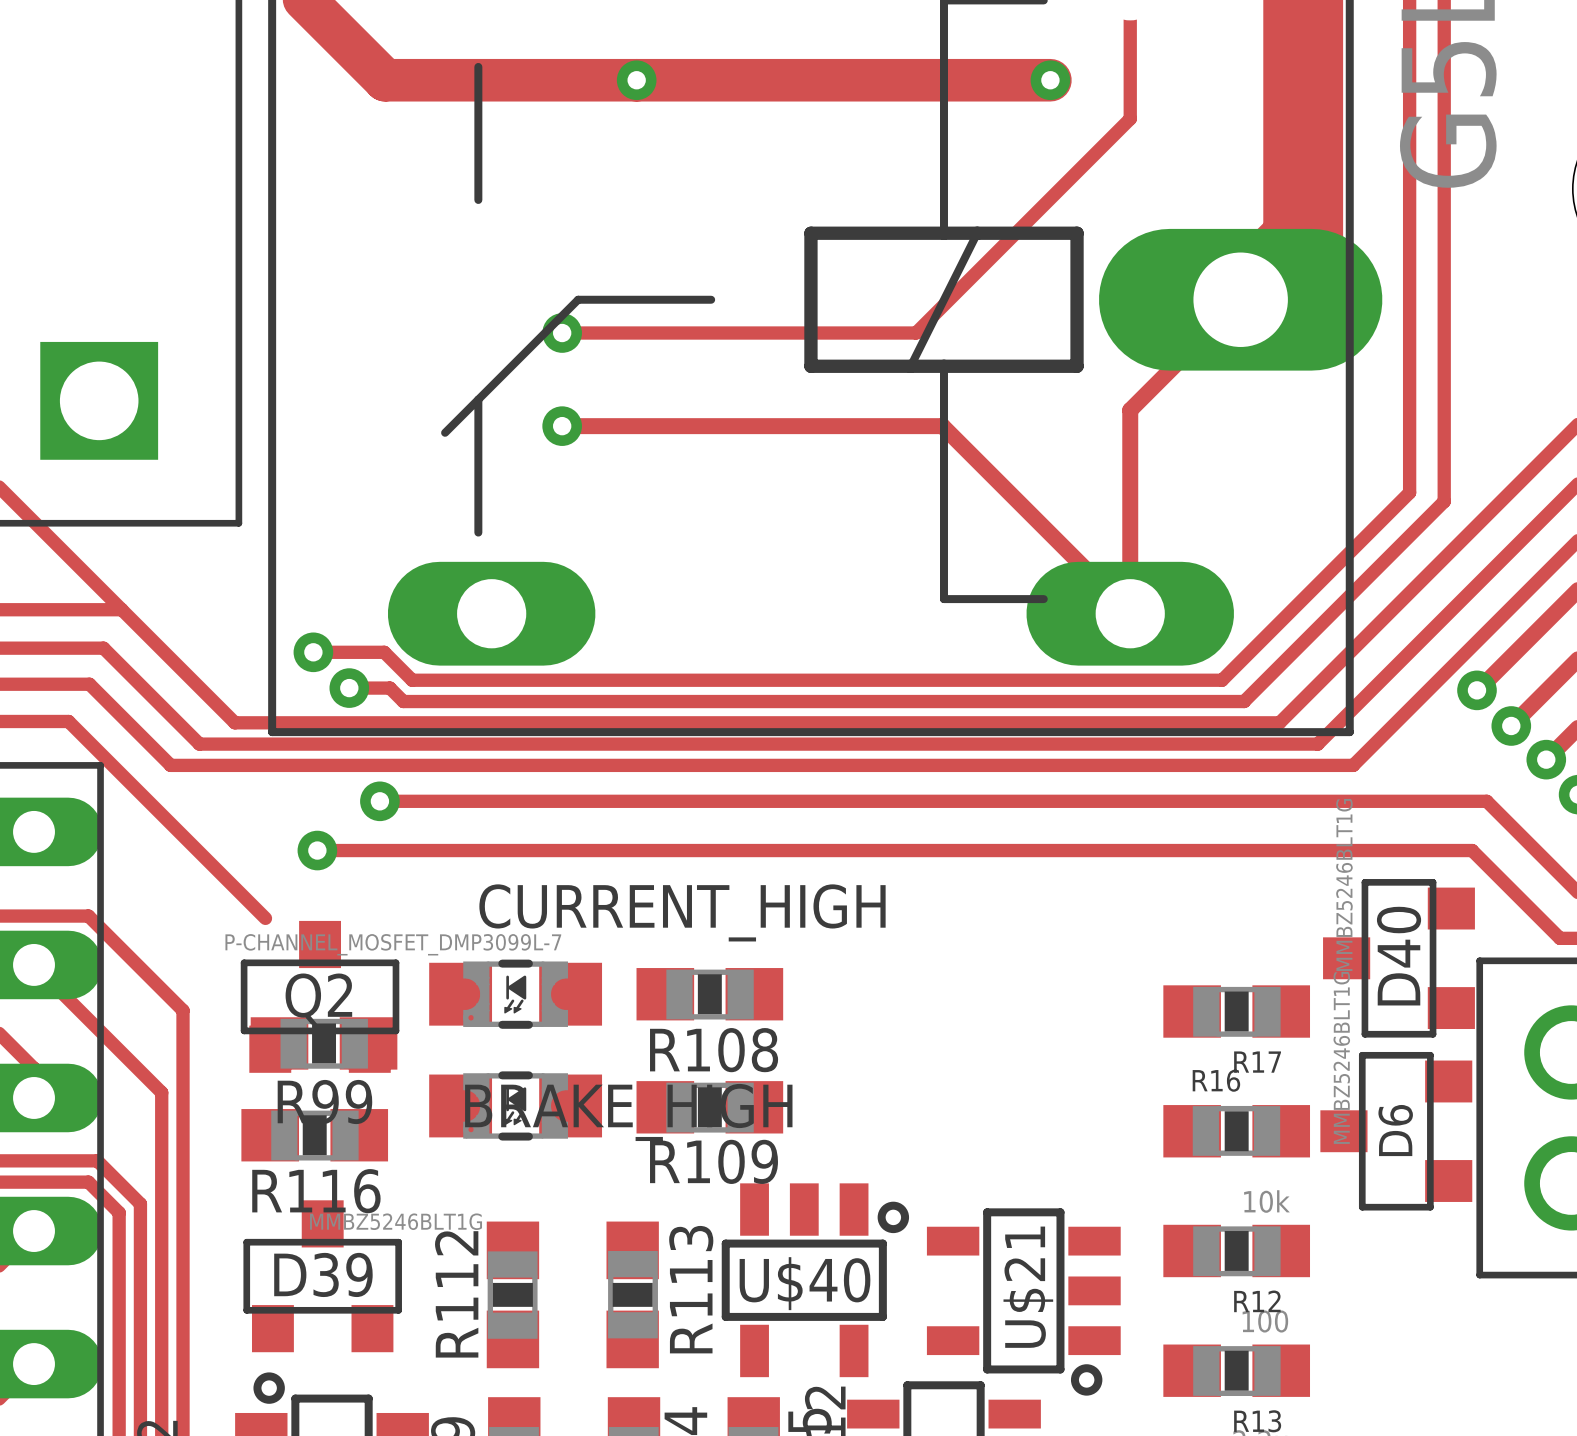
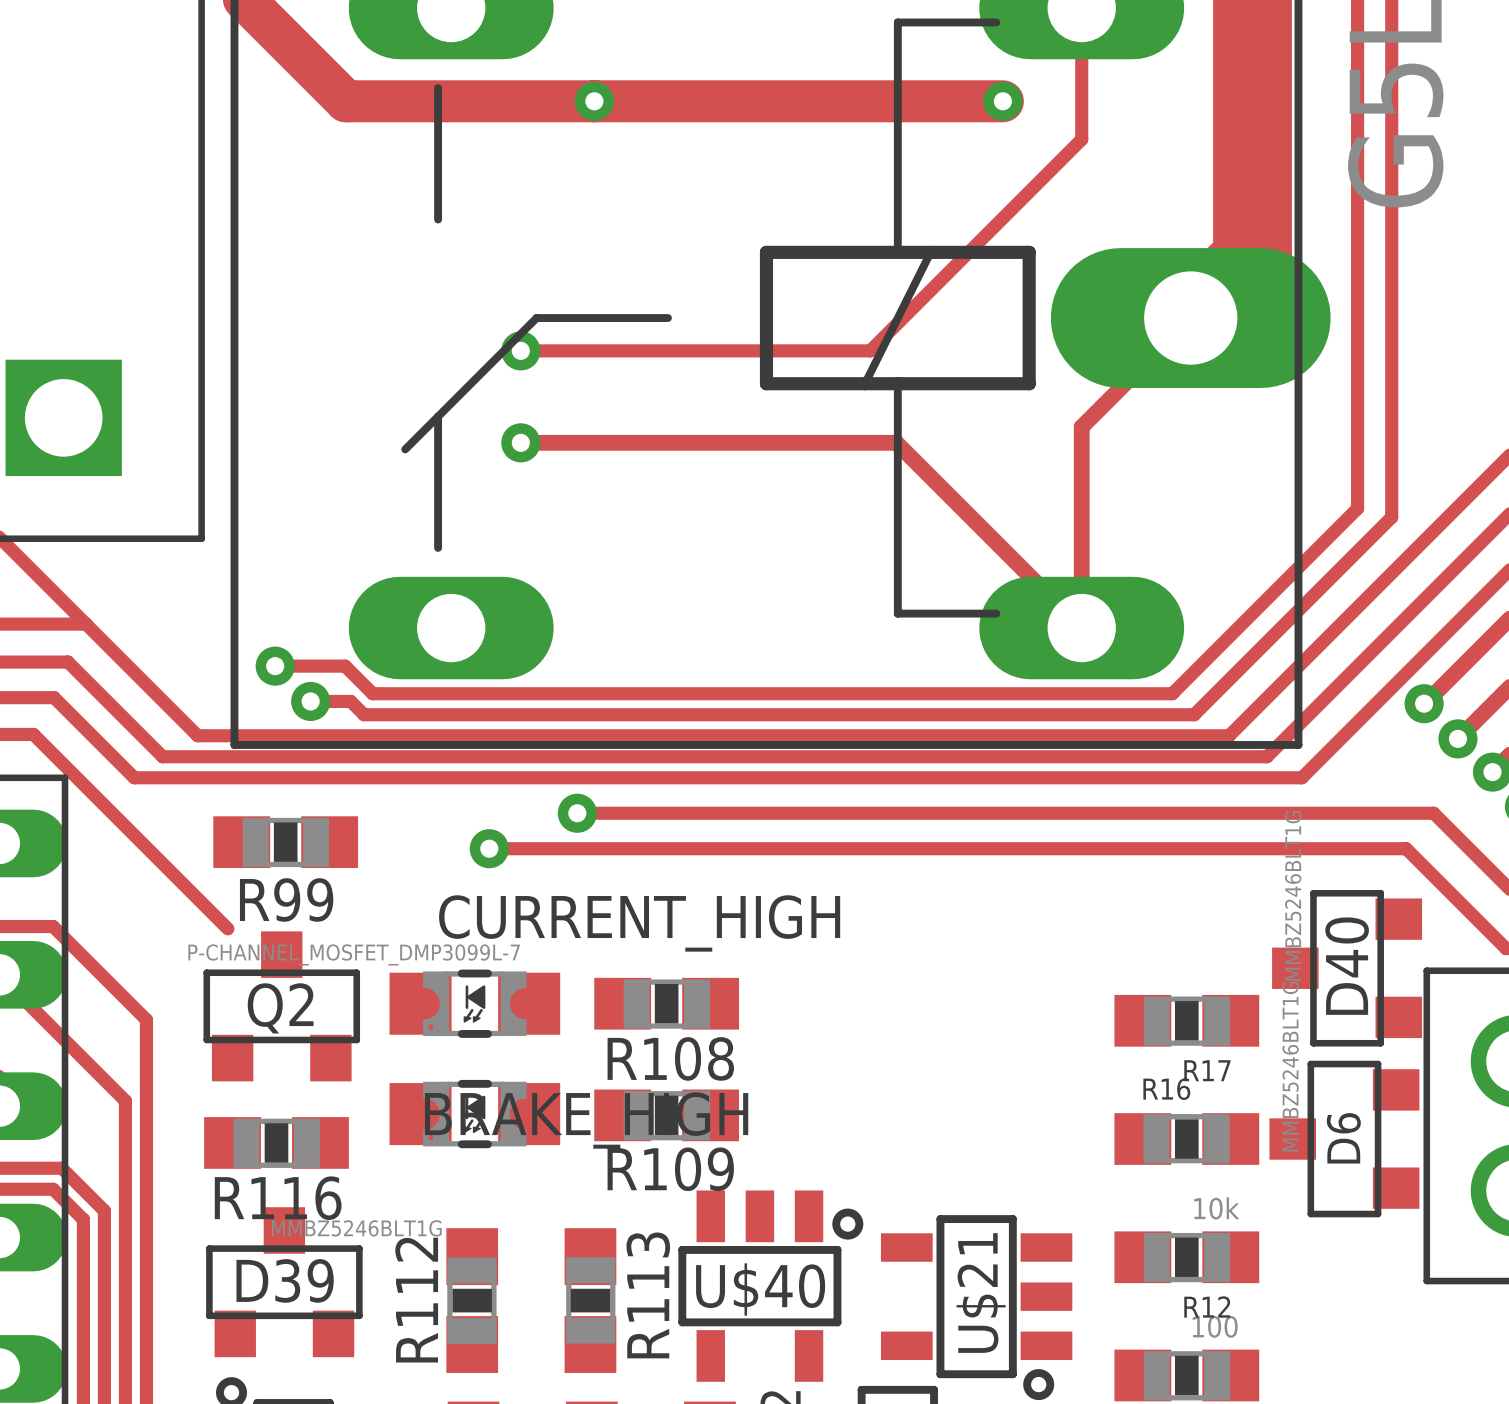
track: (379, 801) (619, 801) -> none
via: (379, 801) -> none
via: none -> (577, 813)
via: none -> (489, 848)
track: (317, 850) (1472, 850) -> (489, 848) (1406, 848) (1419, 861)
via: (317, 850) -> none
R99 position: (324, 1043) -> (285, 842)

